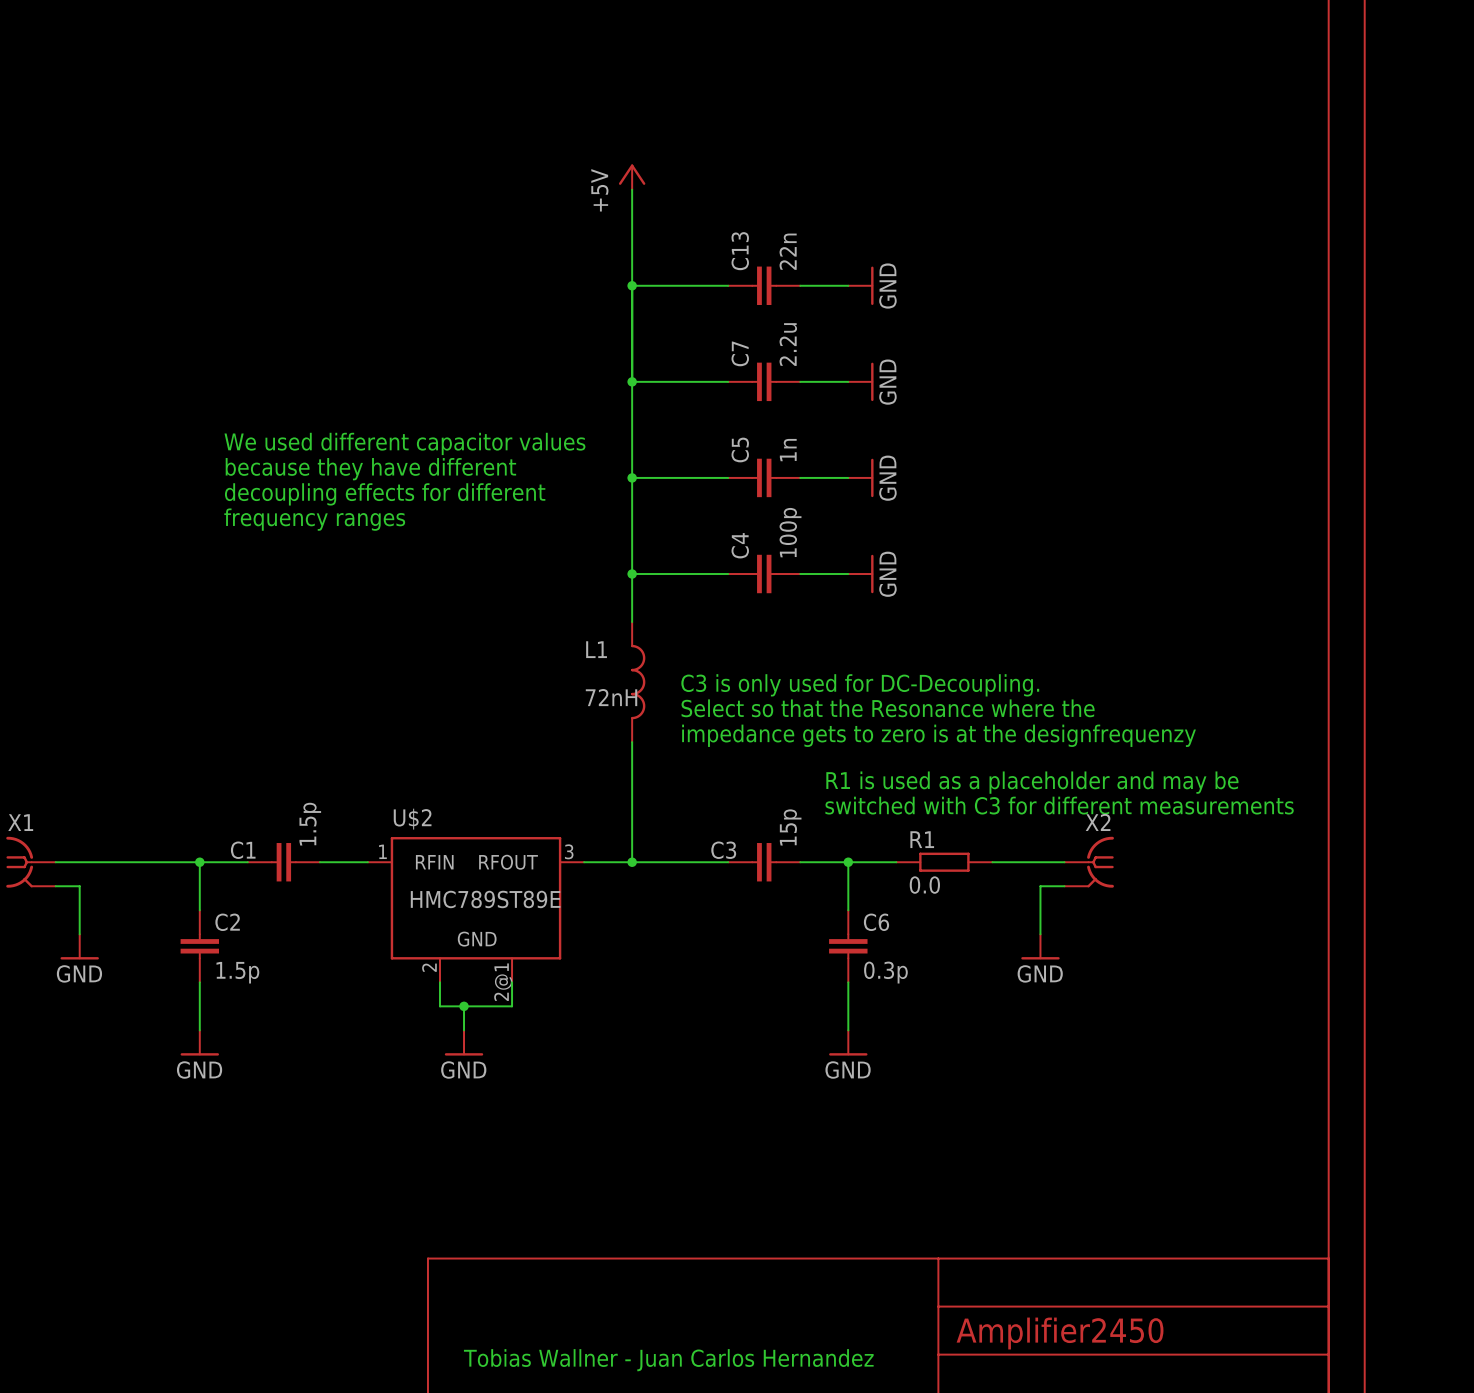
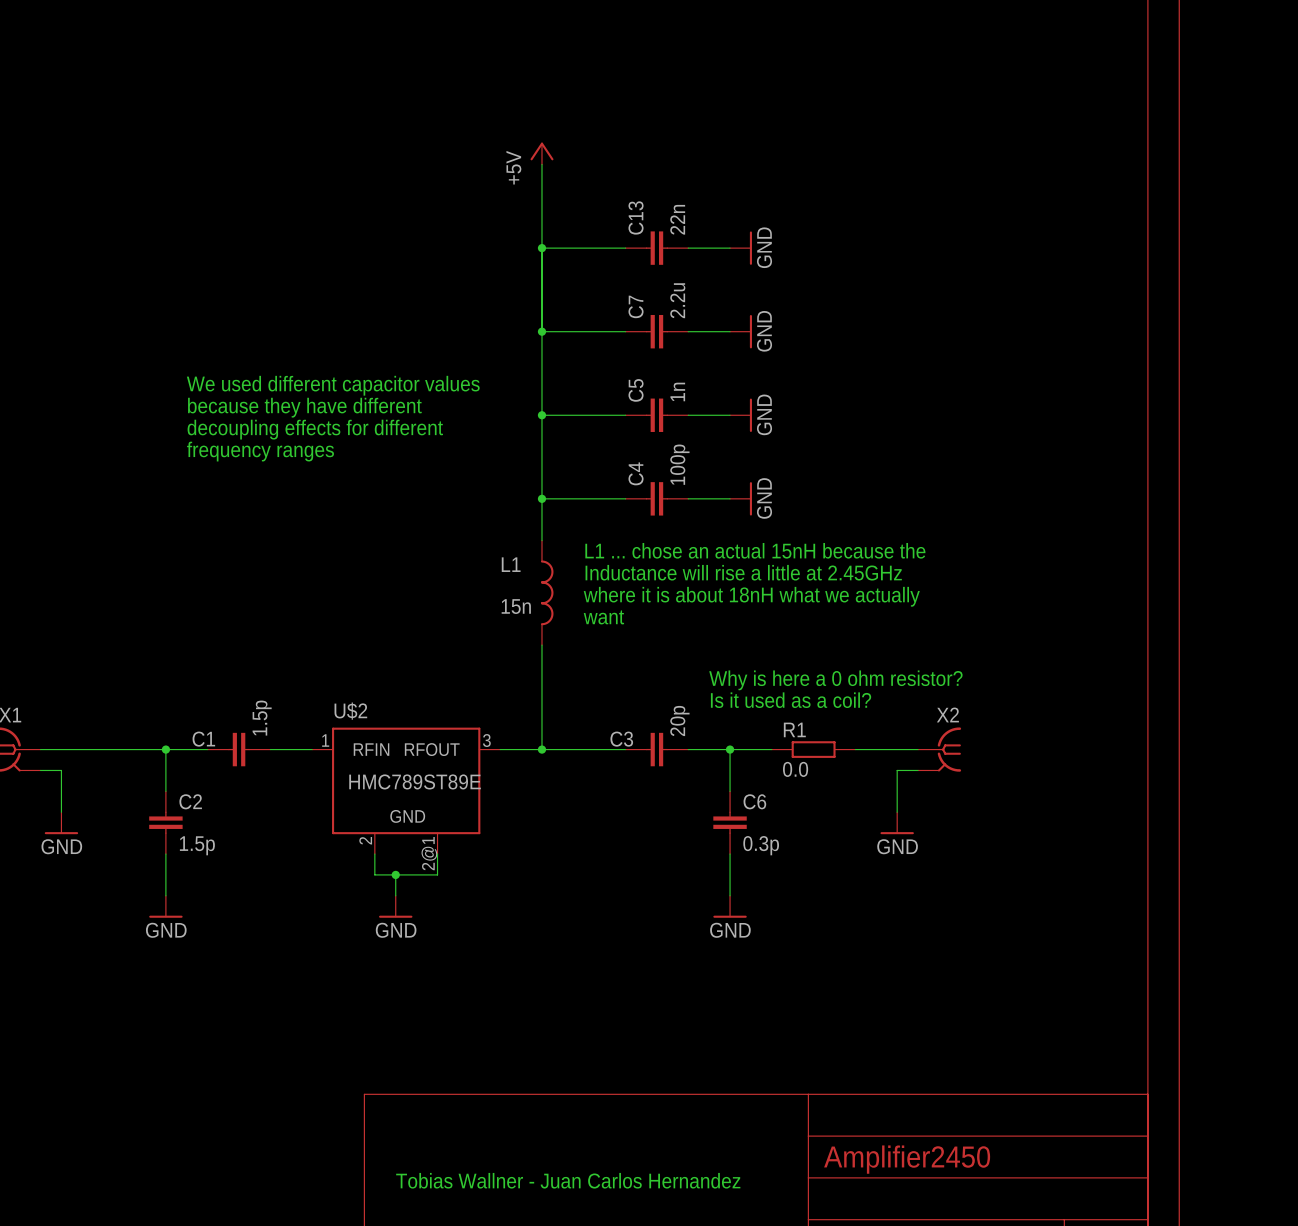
text: none -> L1 ... chose an actual 15nH because the (755, 550)
text: none -> Inductance will rise a little at 2.45GHz (743, 572)
text: C3 is only used for DC-Decoupling. (860, 685) -> where it is about 18nH what we actually (751, 596)
L1 value: 72nH (611, 697) -> 15n (516, 606)
text: Select so that the Resonance where the (888, 708) -> want (603, 617)
text: impedance gets to zero is at the designfrequenzy (939, 735) -> none
text: R1 is used as a placeholder and may be (1032, 782) -> Why is here a 0 ohm resistor? (835, 680)
text: switched with C3 for different measurements (1059, 805) -> Is it used as a coil? (791, 700)
C3 value: 15p (790, 827) -> 20p (679, 720)

